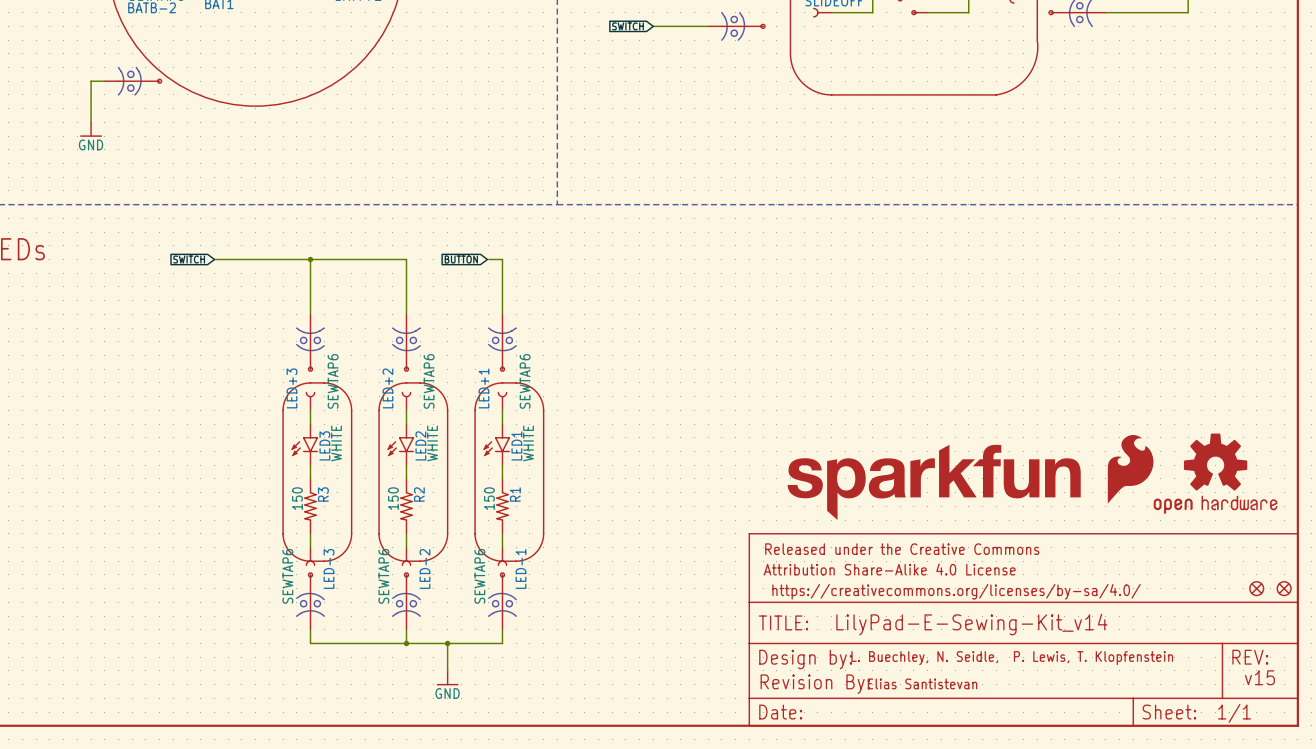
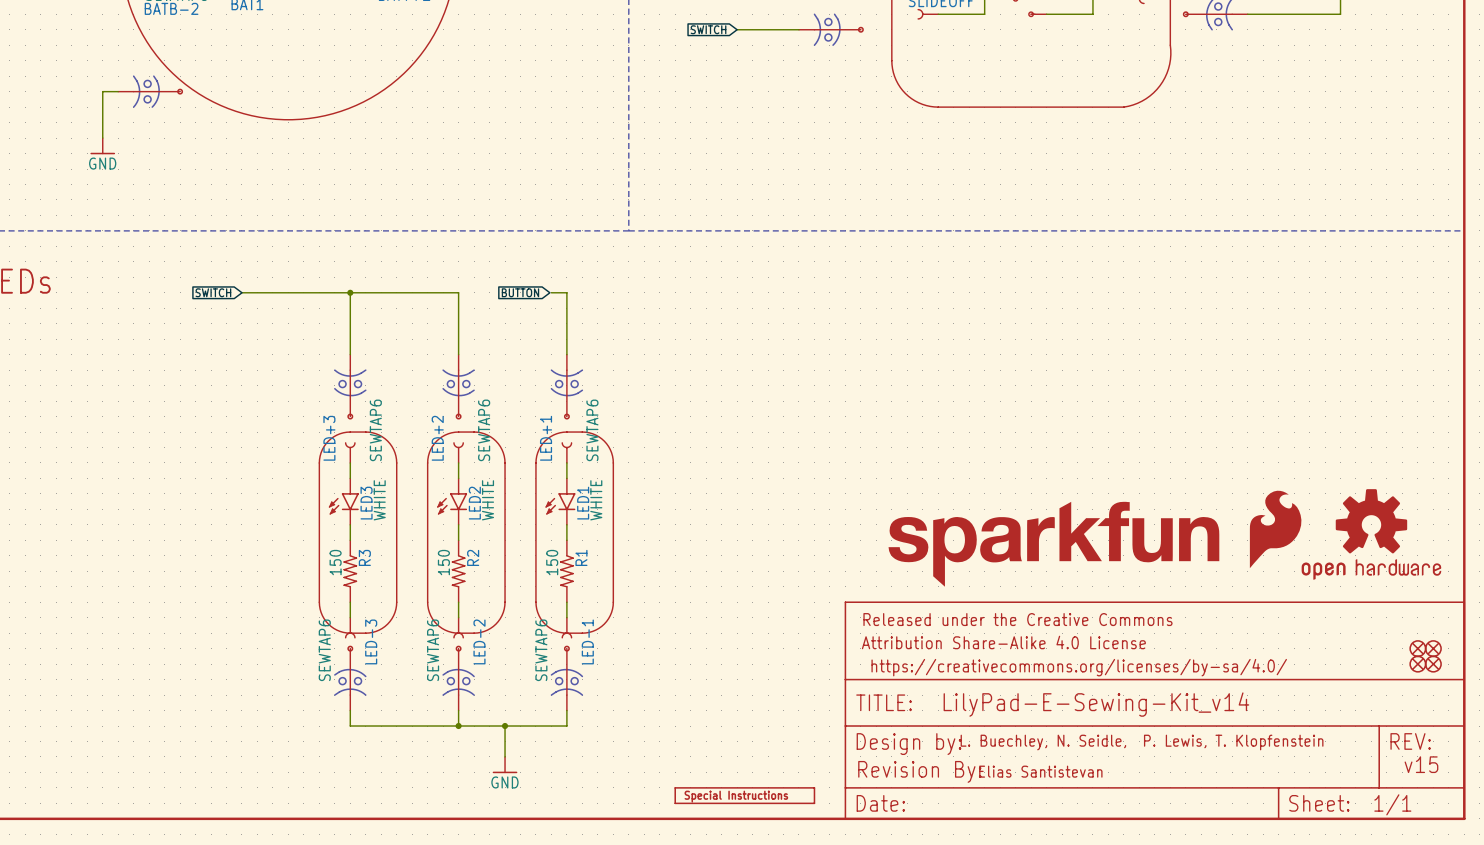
part: none -> (1417, 648)
part: none -> (1433, 648)
part: none -> (1433, 664)
part: (1284, 588) -> none
part: none -> (744, 795)

